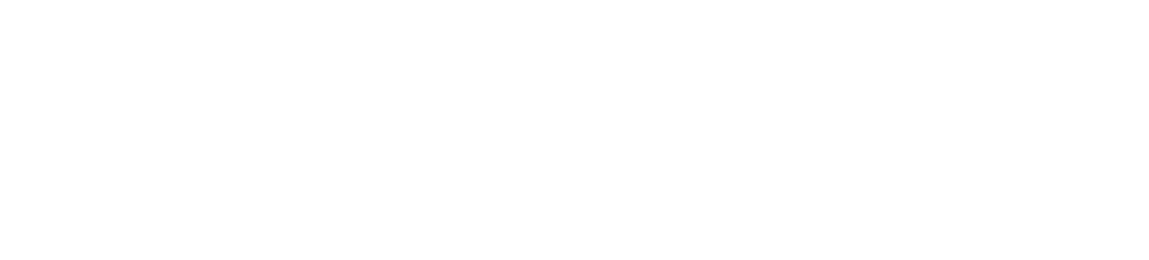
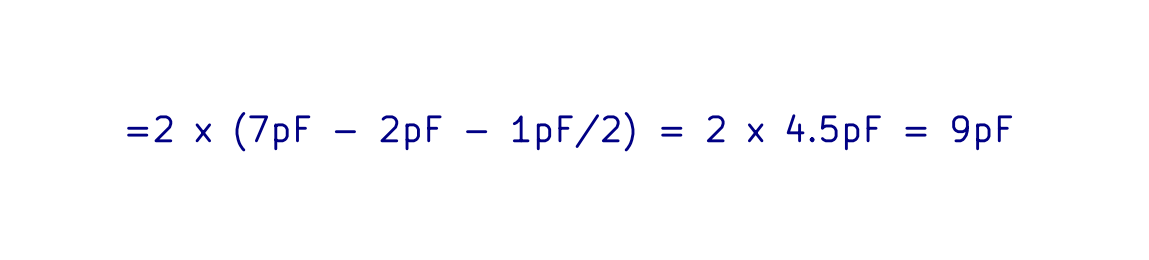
text: none -> =2 x (7pF - 2pF - 1pF/2) = 2 x 4.5pF = 9pF (569, 131)

